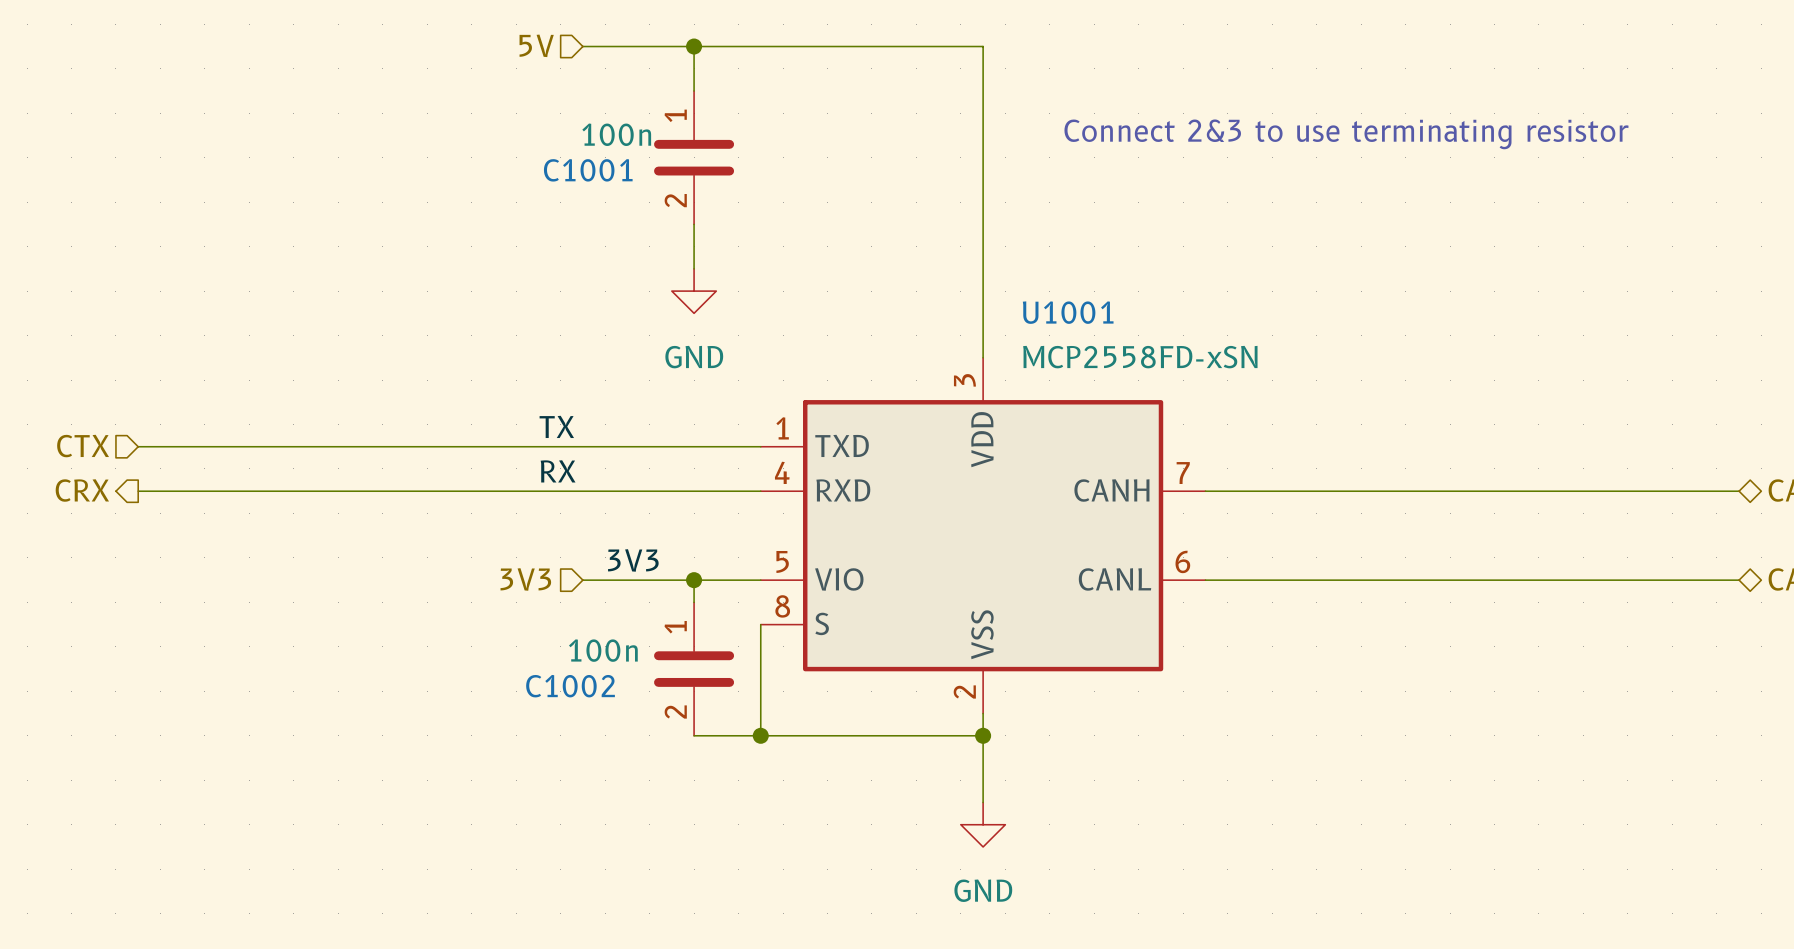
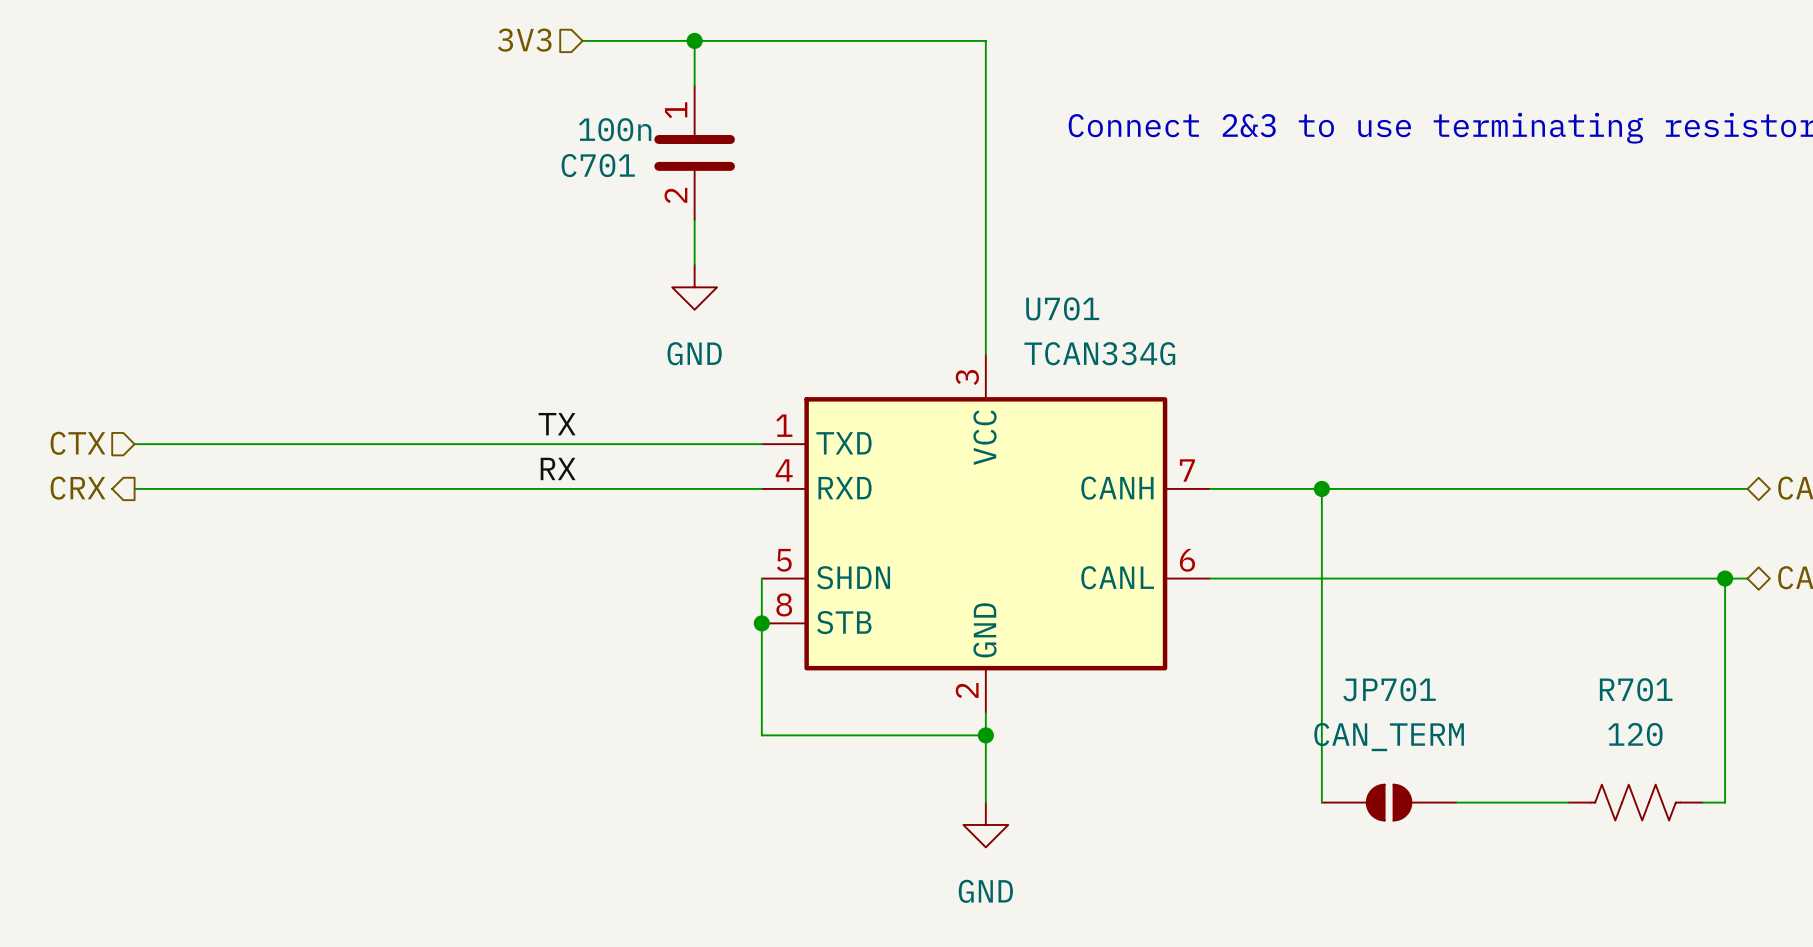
hierarchical label: 5V (536, 45) -> 3V3 (524, 40)
C1001 name: C1001 (588, 170) -> C701 (598, 165)
U1001 name: U1001 (1068, 312) -> U701 (1062, 308)
U1001 value: MCP2558FD-xSN (1140, 357) -> TCAN334G (1099, 353)
U1001 pin name: VDD (982, 439) -> VCC (985, 437)
wire: none -> (1321, 488) (1321, 802)
junction: none -> (1321, 488)
label: 3V3 (633, 560) -> none
hierarchical label: 3V3 (525, 579) -> none
U1001 pin name: VIO (839, 579) -> SHDN (853, 577)
wire: (582, 580) (760, 580) -> (761, 623) (761, 578)
wire: (694, 580) (694, 602) -> none
junction: (694, 580) -> none
wire: none -> (1725, 578) (1725, 802) (1702, 802)
junction: none -> (1725, 578)
U1001 pin name: S (822, 623) -> STB (844, 622)
junction: none -> (761, 623)
U1001 pin name: VSS (982, 634) -> GND (985, 630)
C1002: 100n (694, 669) -> none
wire: (694, 735) (760, 735) -> none
junction: (760, 735) -> none
JP701: none -> CAN_TERM (1389, 802)
wire: none -> (1456, 802) (1568, 802)
R701: none -> 120 (1635, 802)

